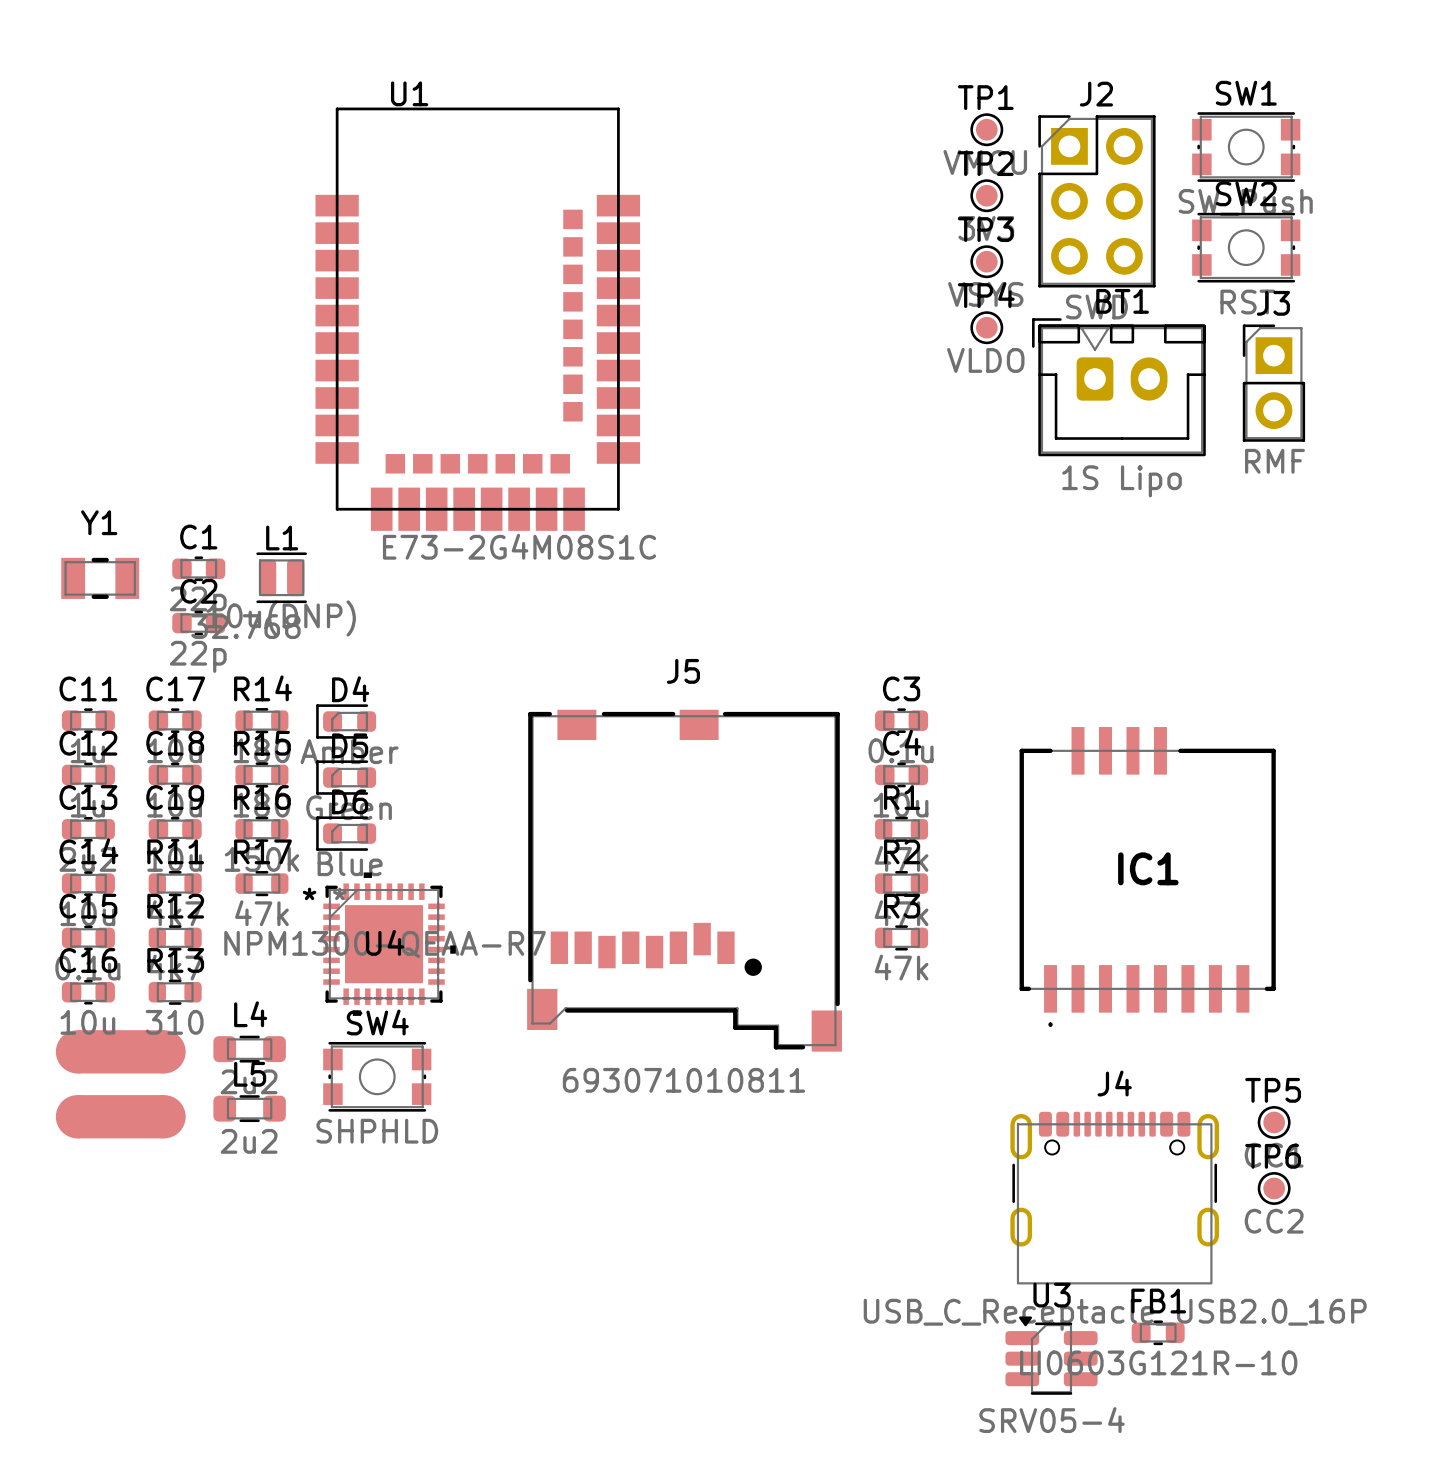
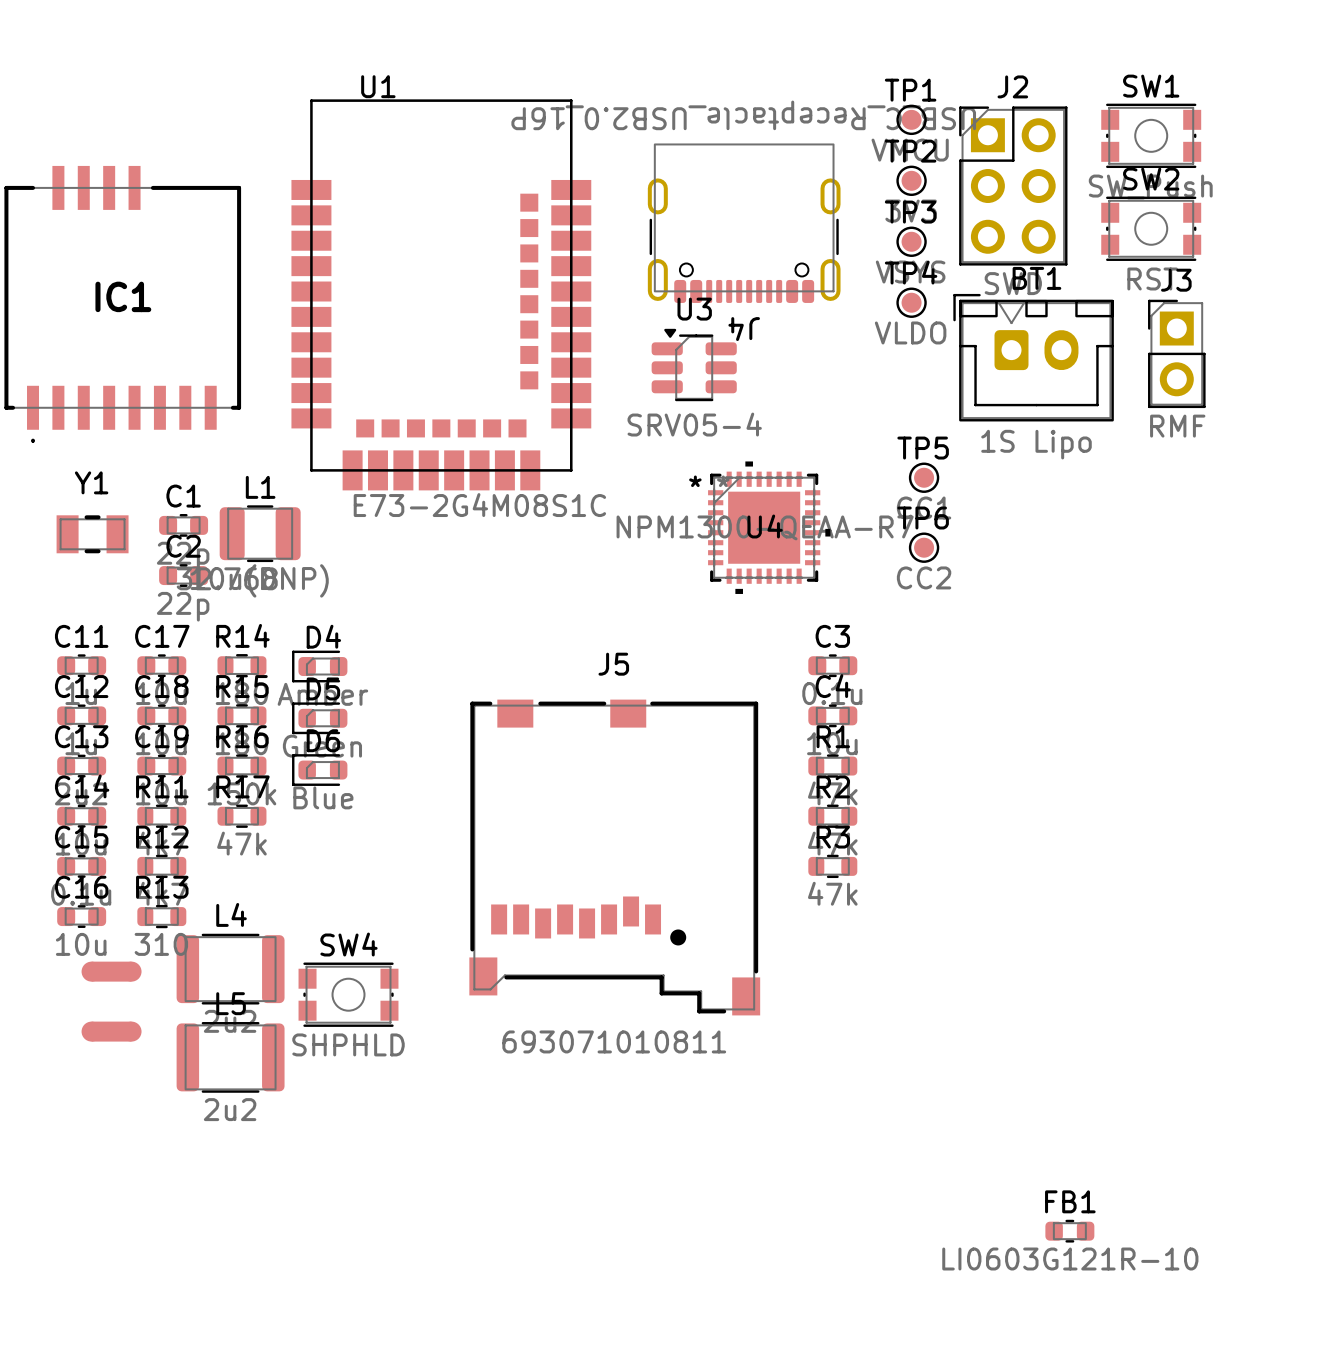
L1 footprint: [256, 552, 307, 604] -> [219, 505, 301, 563]
IC1 position: (1147, 876) -> (122, 304)
J5 position: (684, 880) -> (614, 857)
U4 position: (389, 944) -> (769, 527)
part footprint: [55, 1030, 186, 1074] -> [81, 961, 142, 982]
L4 footprint: [213, 1035, 286, 1063] -> [176, 933, 285, 1005]
part footprint: [55, 1095, 186, 1139] -> [81, 1021, 142, 1042]
L5 footprint: [213, 1095, 286, 1123] -> [176, 1022, 285, 1093]
TP5 position: (1274, 1122) -> (924, 477)
TP6 position: (1274, 1188) -> (924, 547)
J4 rotation: 0° (1114, 1198) -> 180° (744, 223)
J4 position: (1114, 1198) -> (744, 223)
U3 position: (1051, 1355) -> (694, 365)

